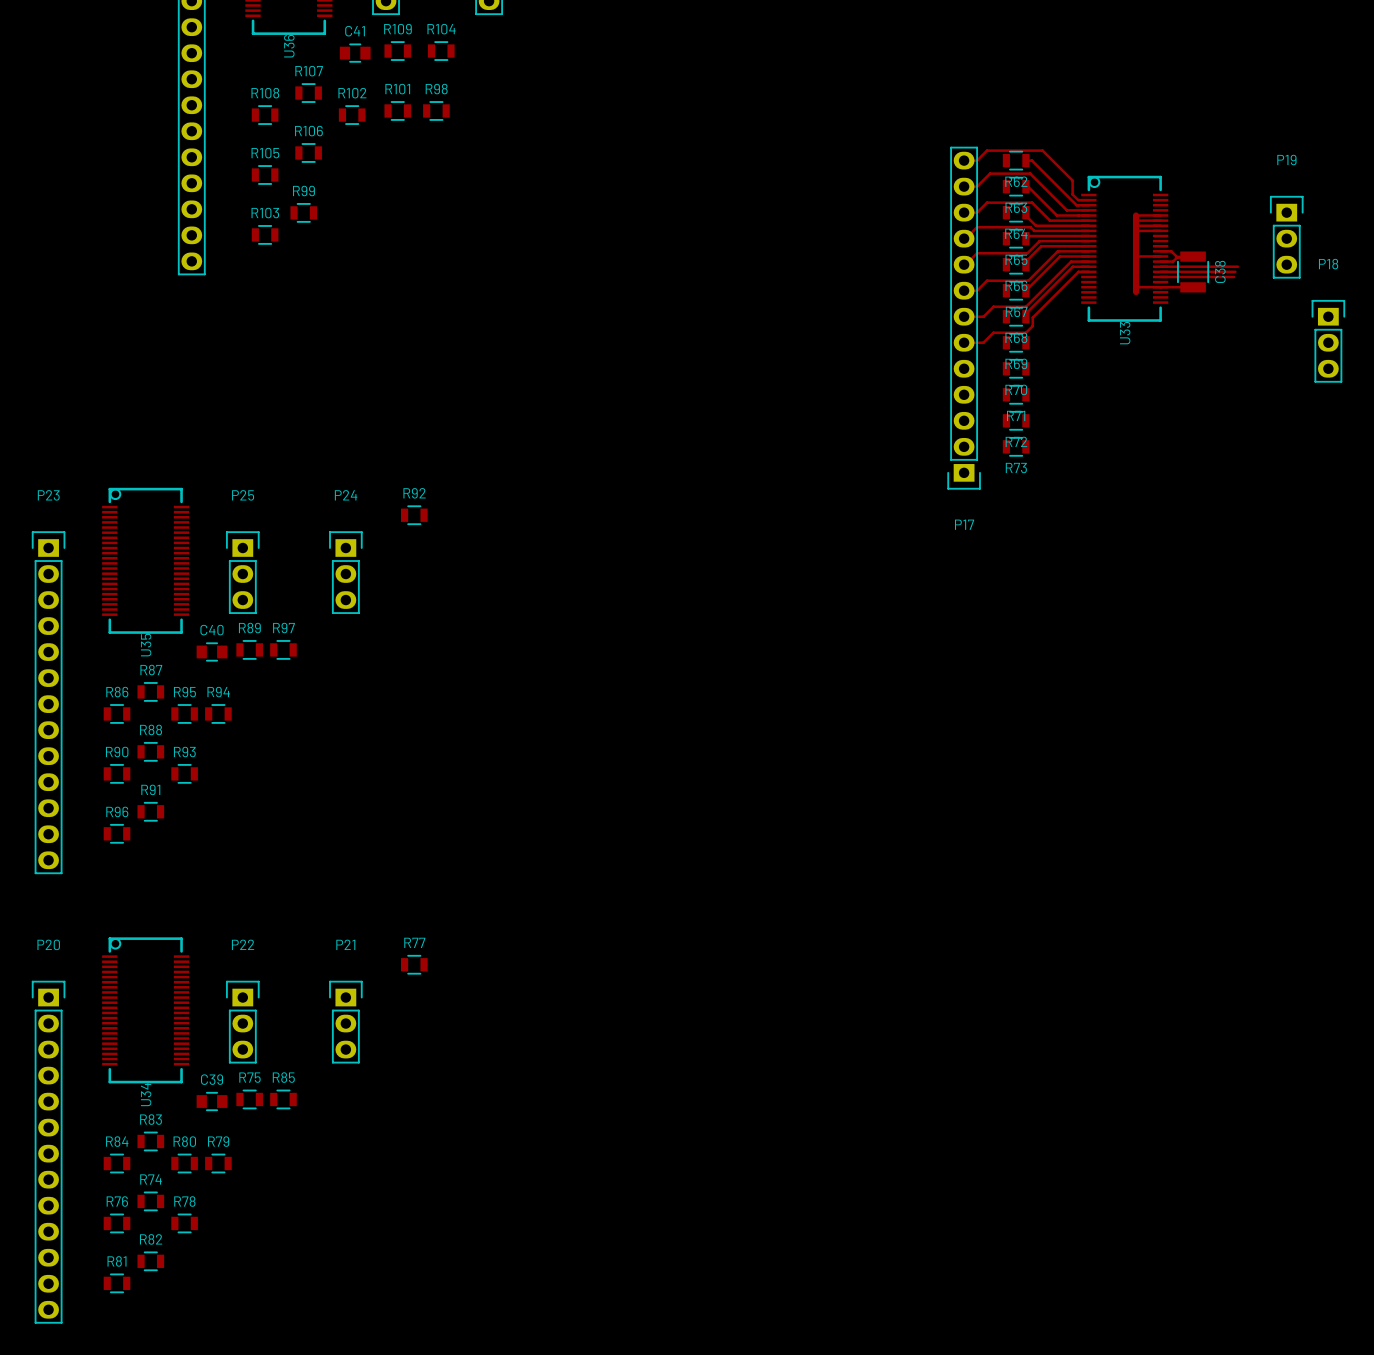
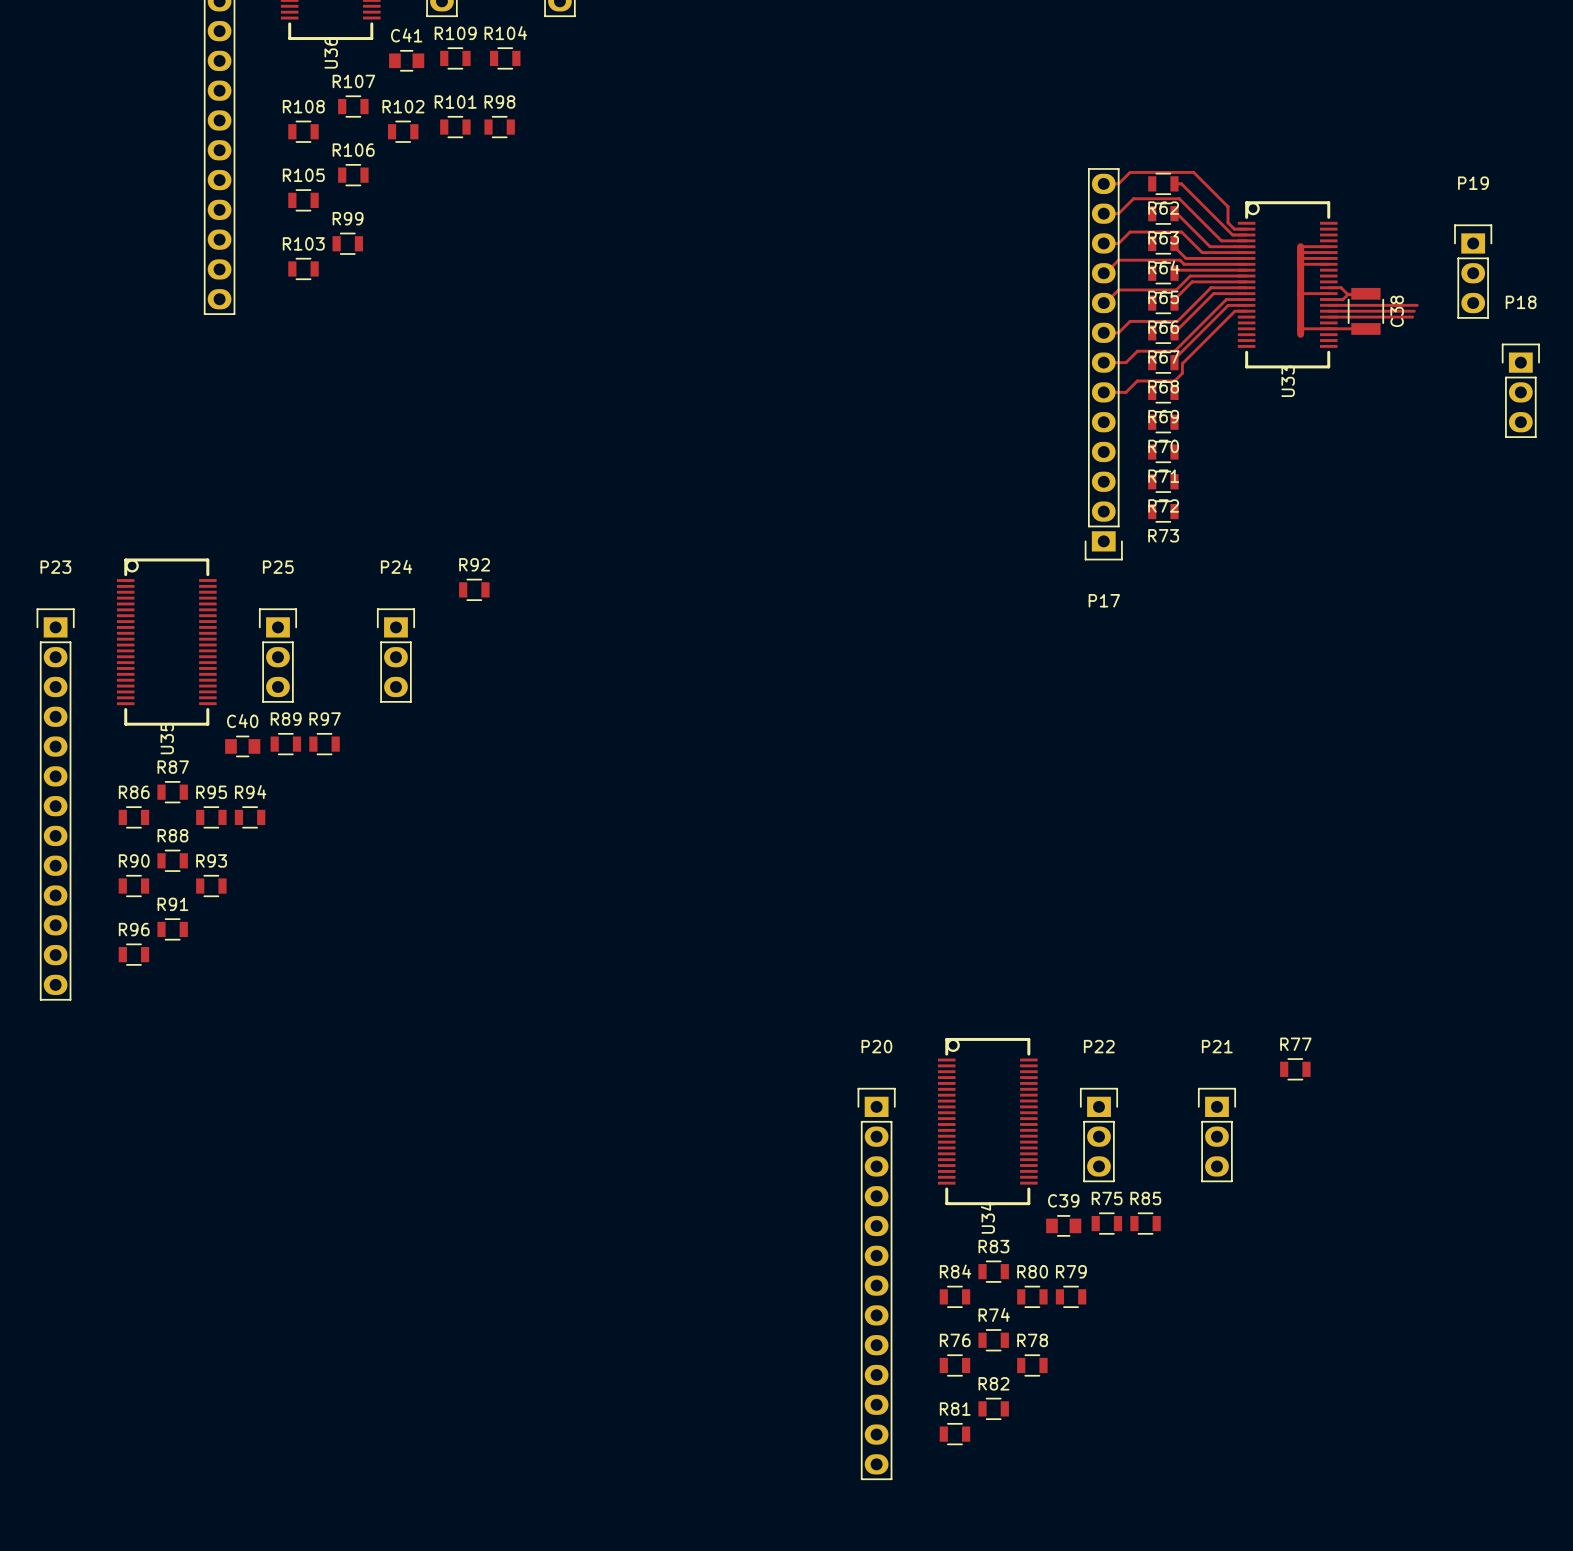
R77 position: (414, 964) -> (1295, 1069)
U34 position: (145, 1010) -> (987, 1121)
P22 position: (242, 1022) -> (1098, 1135)
P21 position: (345, 1022) -> (1216, 1135)
R75 position: (249, 1099) -> (1106, 1223)
R85 position: (283, 1099) -> (1145, 1223)
C39 position: (211, 1101) -> (1063, 1225)
R83 position: (150, 1141) -> (993, 1271)
P20 position: (48, 1152) -> (876, 1283)
R84 position: (116, 1163) -> (954, 1296)
R80 position: (184, 1163) -> (1032, 1296)
R79 position: (218, 1163) -> (1071, 1296)
R74 position: (150, 1201) -> (993, 1340)
R76 position: (116, 1223) -> (954, 1365)
R78 position: (184, 1223) -> (1032, 1365)
R82 position: (150, 1261) -> (993, 1408)
R81 position: (116, 1283) -> (954, 1434)

